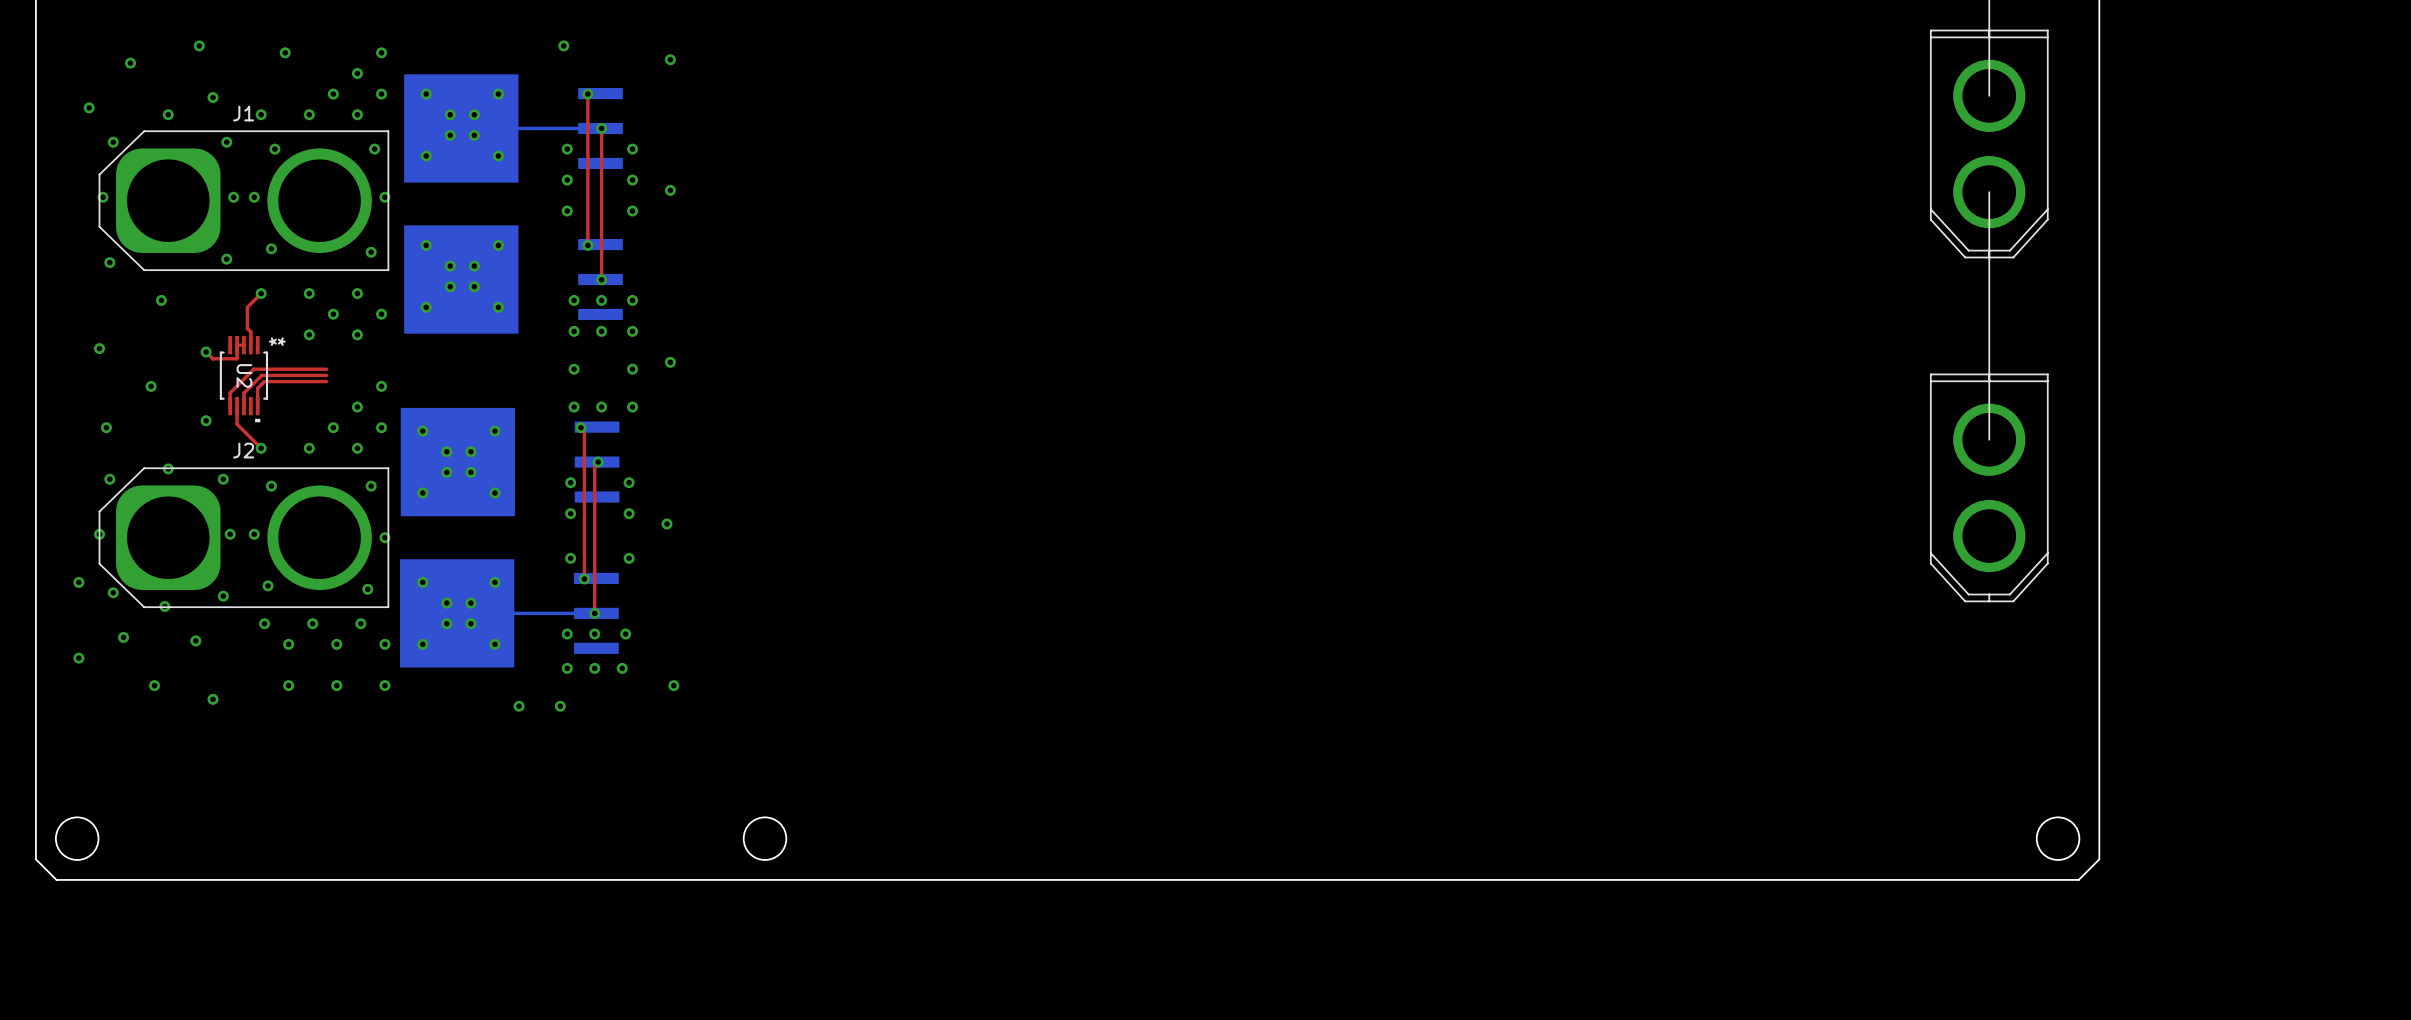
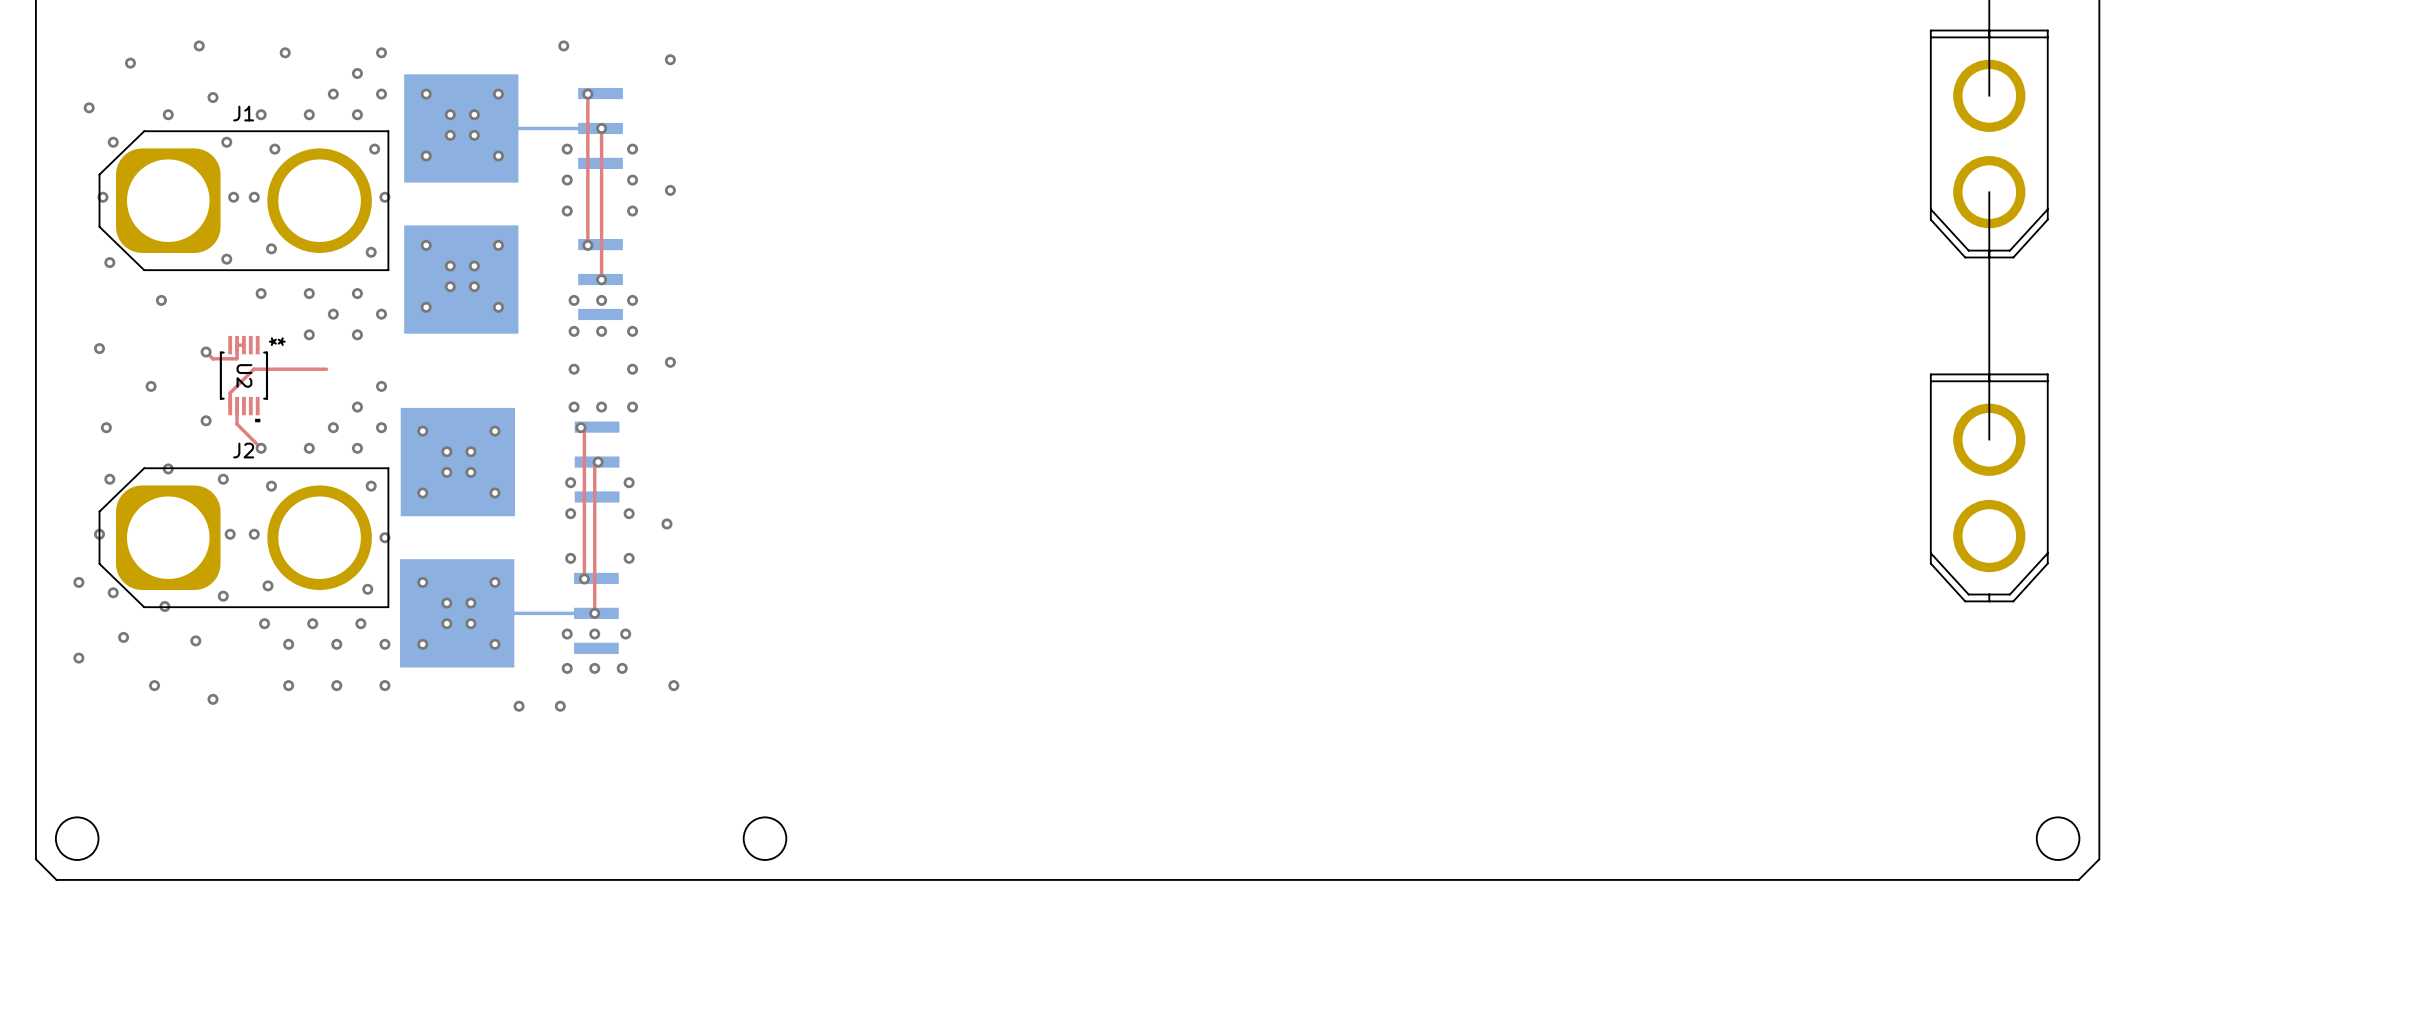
top track: (261, 293) (247, 307) (247, 328) (250, 331) (250, 345) -> none
top track: (326, 375) (261, 375) (243, 393) (243, 406) -> none
top track: (326, 381) (264, 381) (257, 388) (257, 406) -> none

